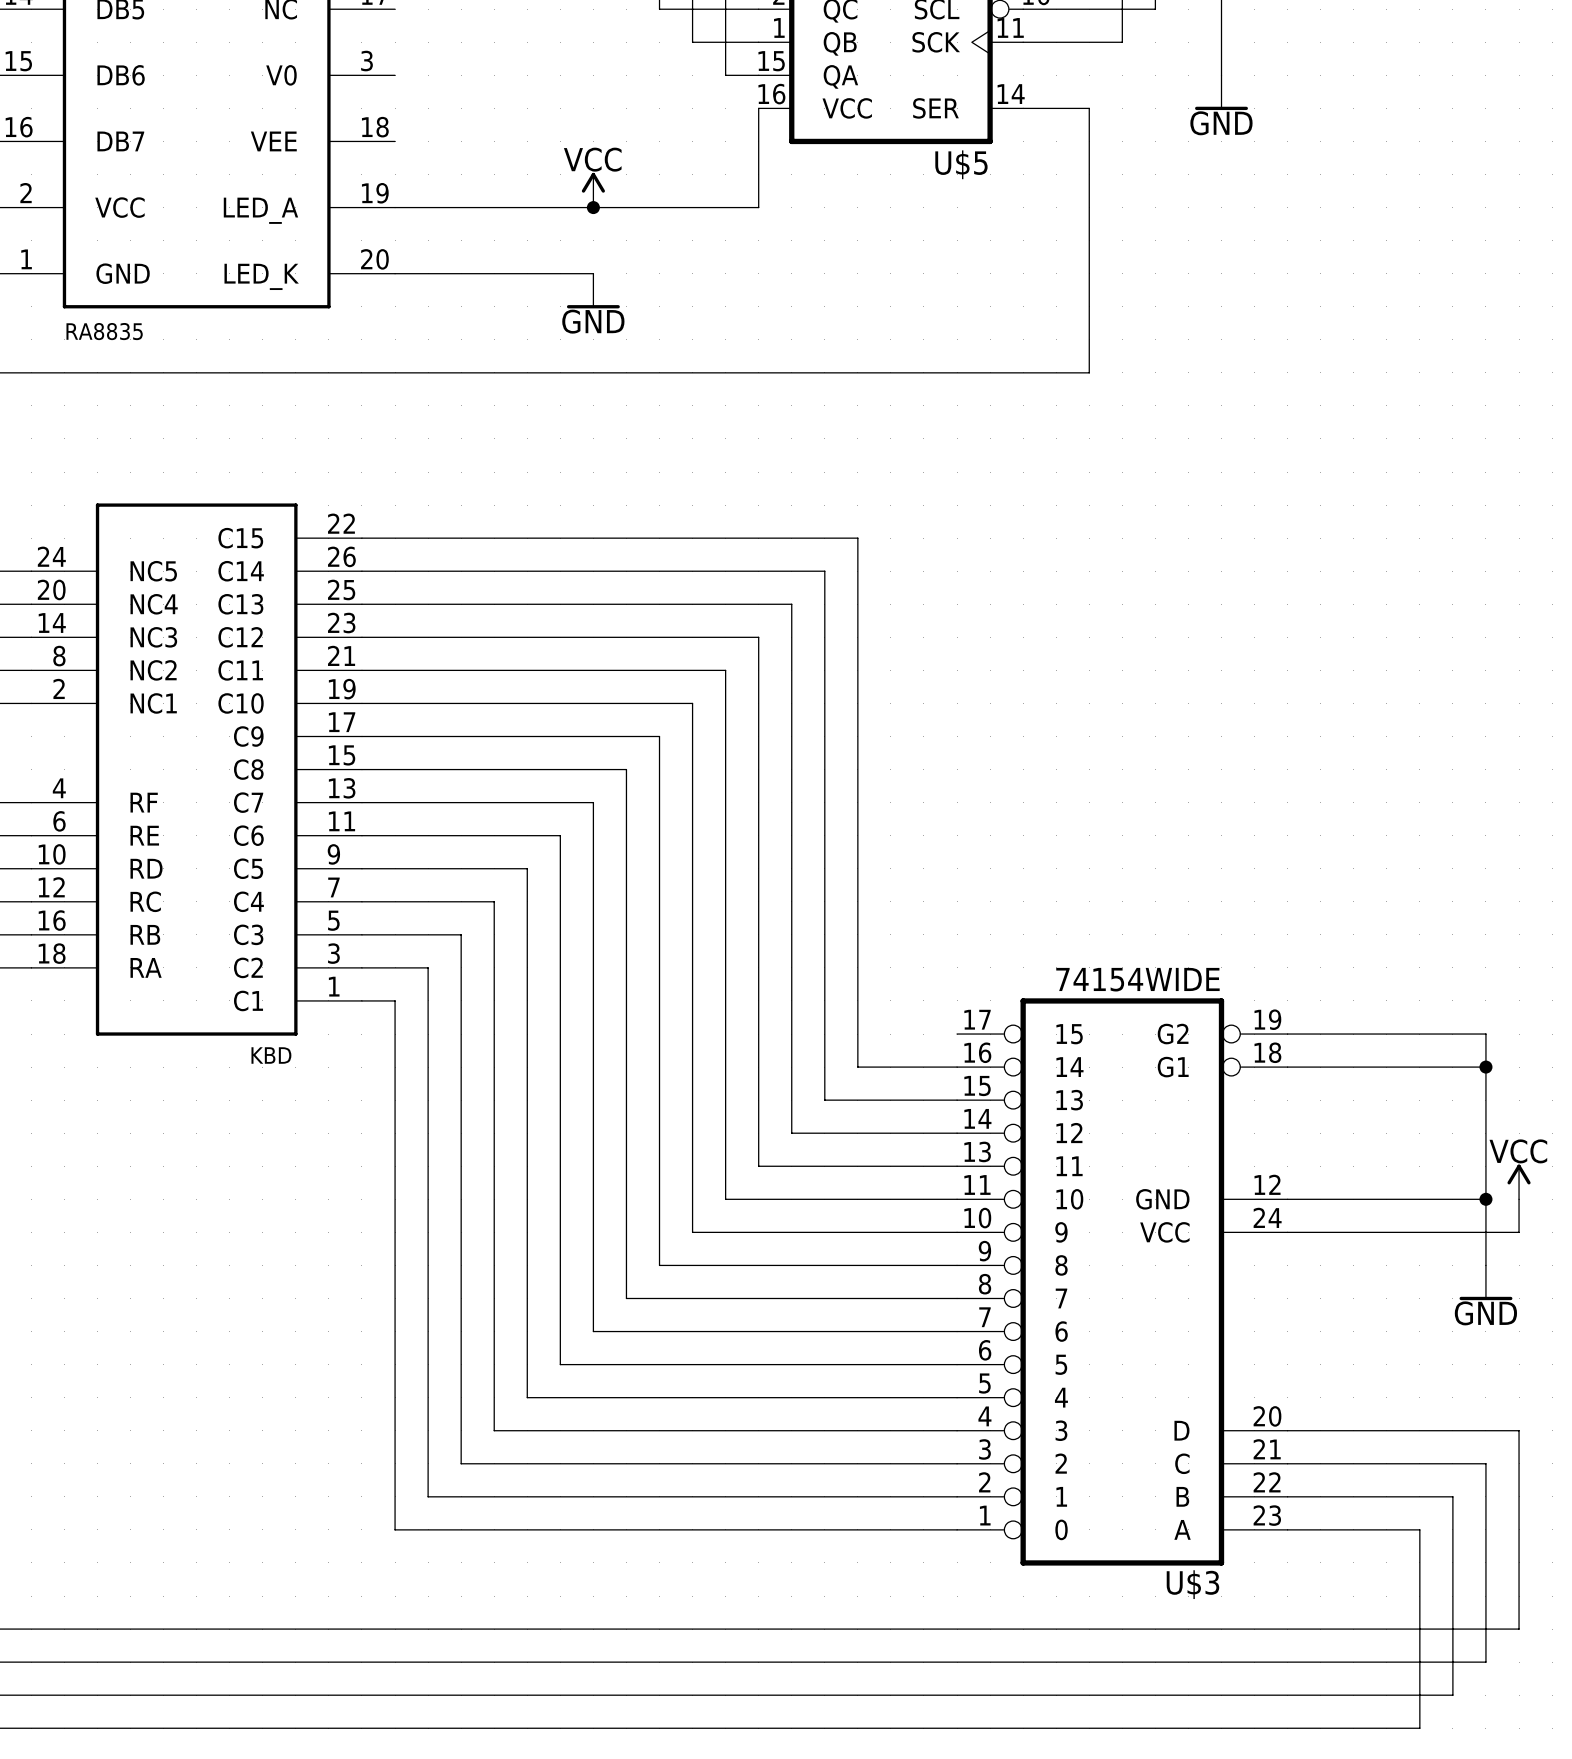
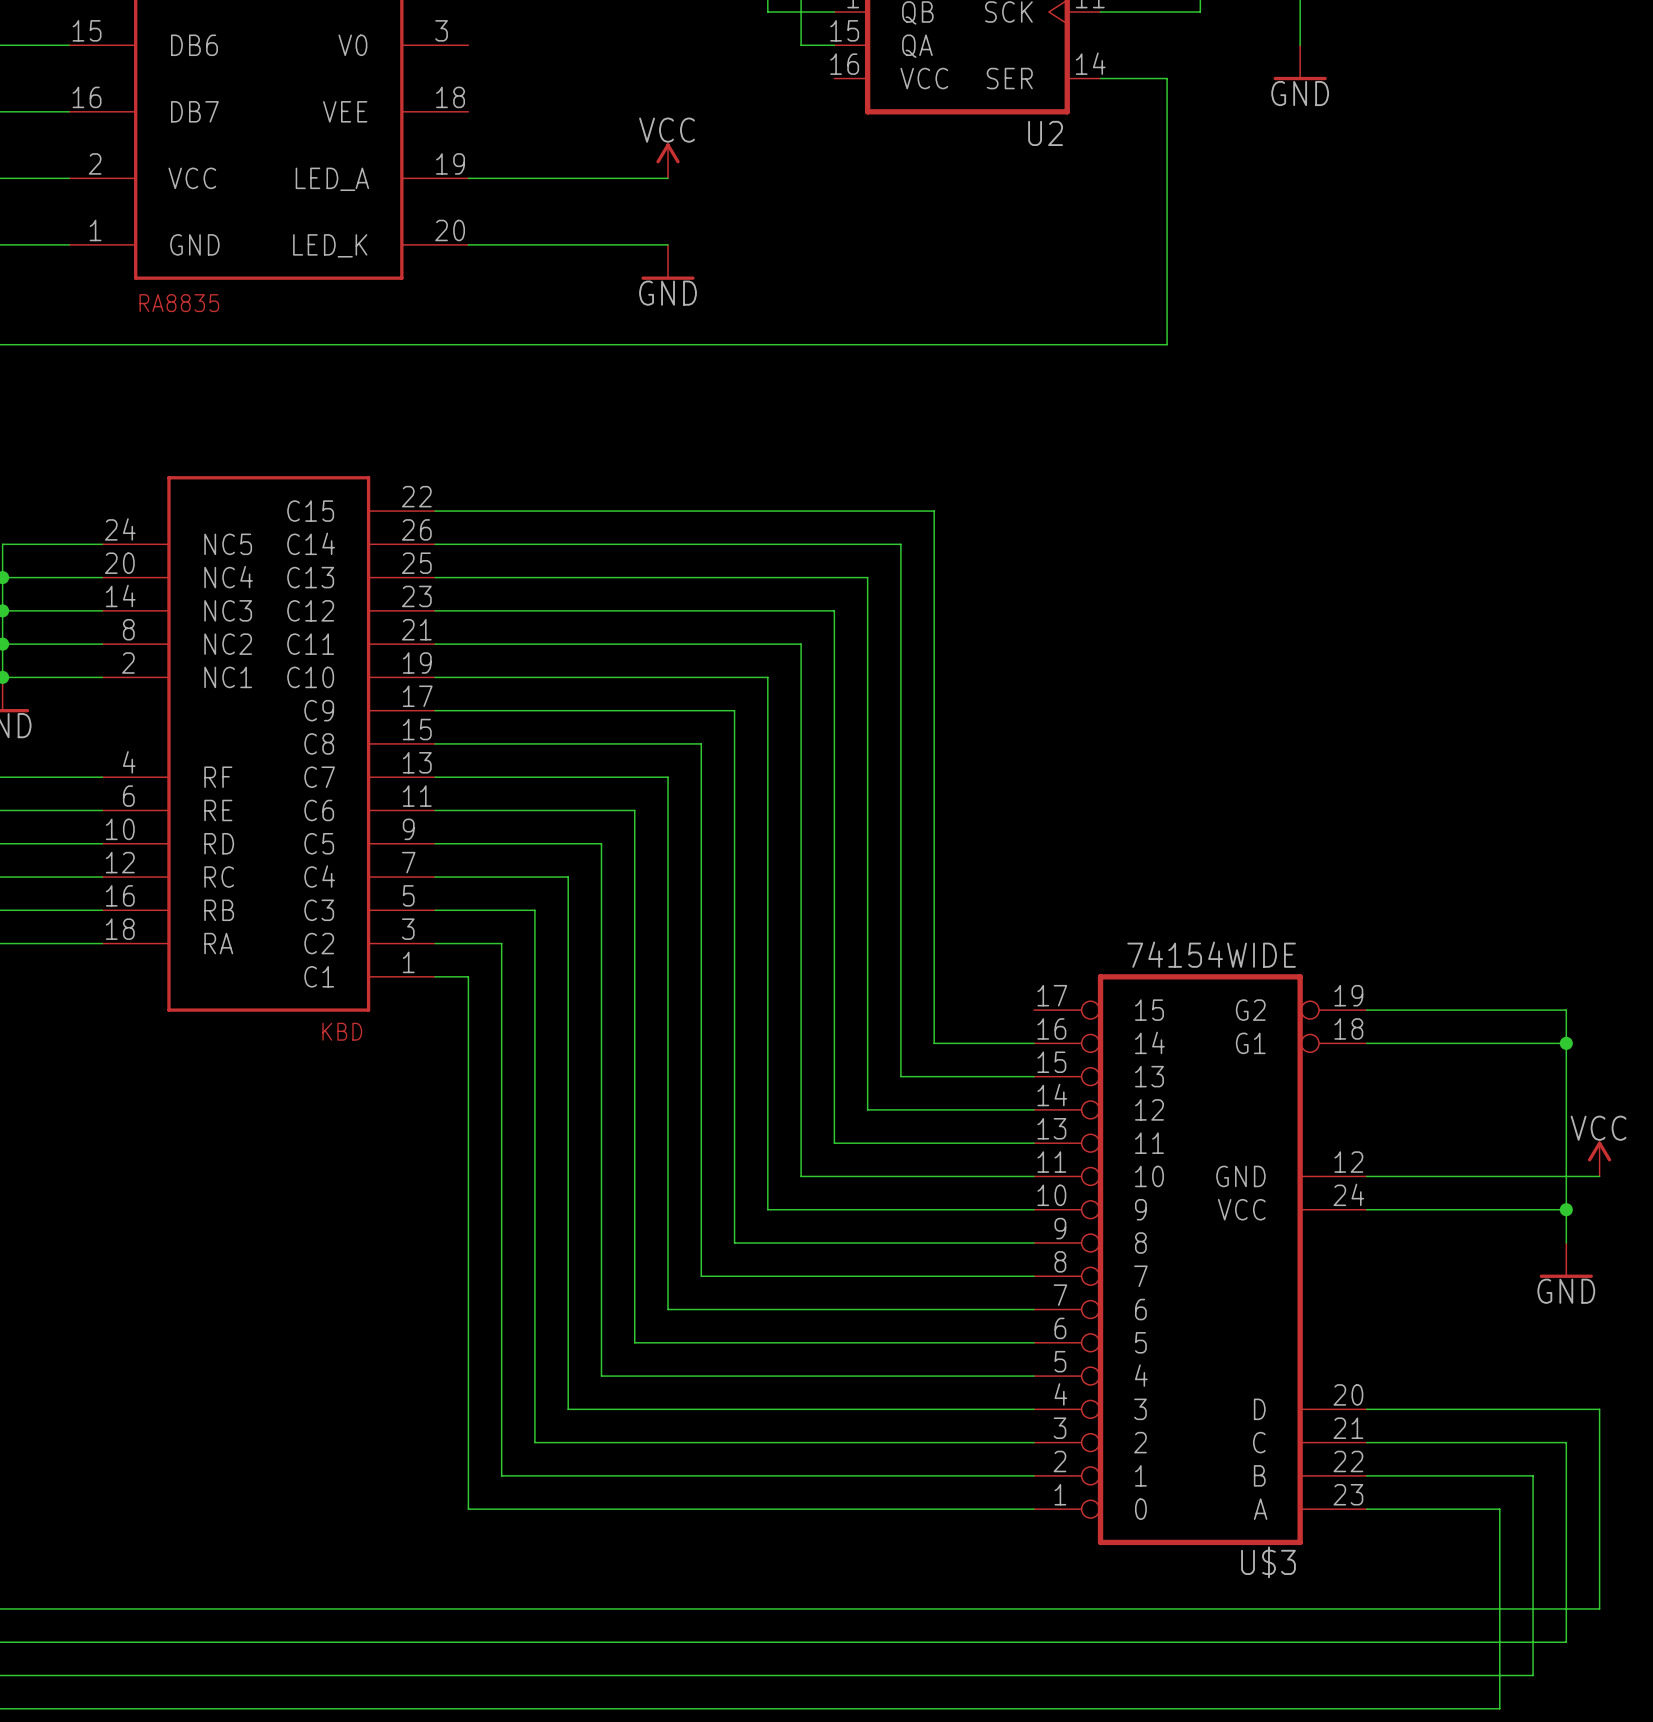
wire: (758, 108) (758, 207) (593, 207) -> none
U$5 name: U$5 (961, 164) -> U2 (1045, 133)
junction: (593, 207) -> none
junction position: (1485, 1199) -> (1566, 1209)
wire: (1519, 1199) (1519, 1232) (1485, 1232) -> (1599, 1176) (1566, 1176)

